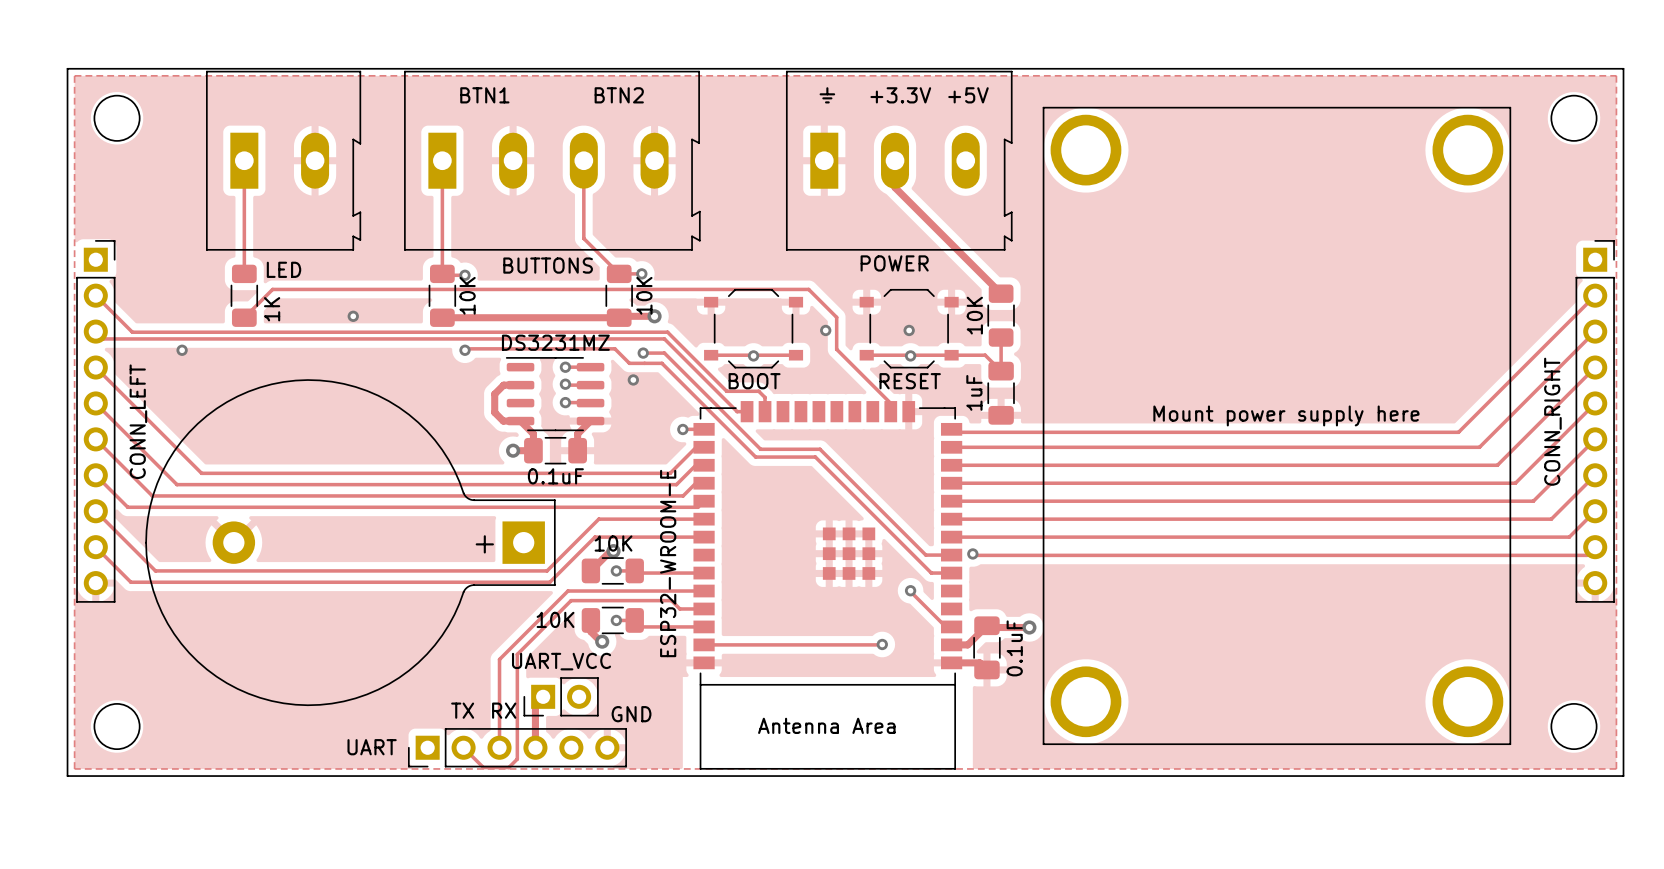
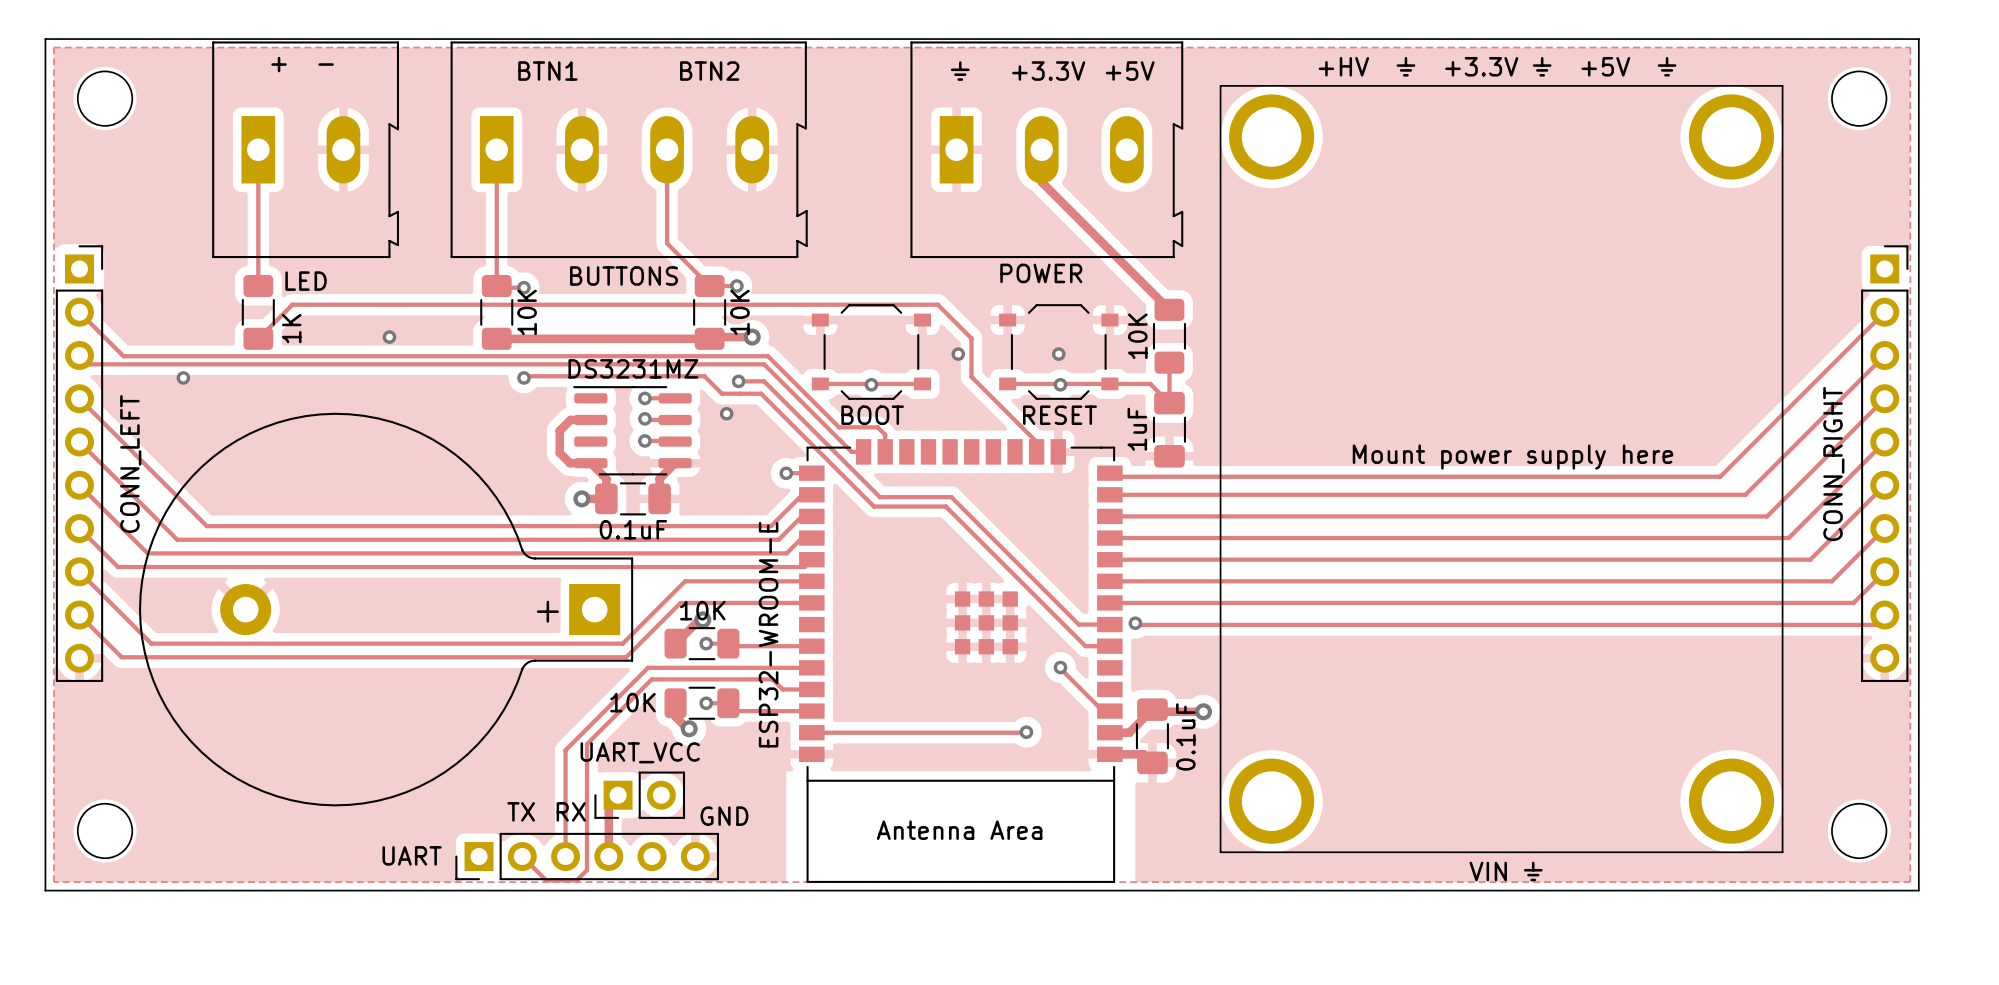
text: none -> + - (302, 64)
text: none -> +HV ⏚ +3.3V ⏚ +5V ⏚ (1497, 66)
text: none -> VIN ⏚ (1506, 871)

